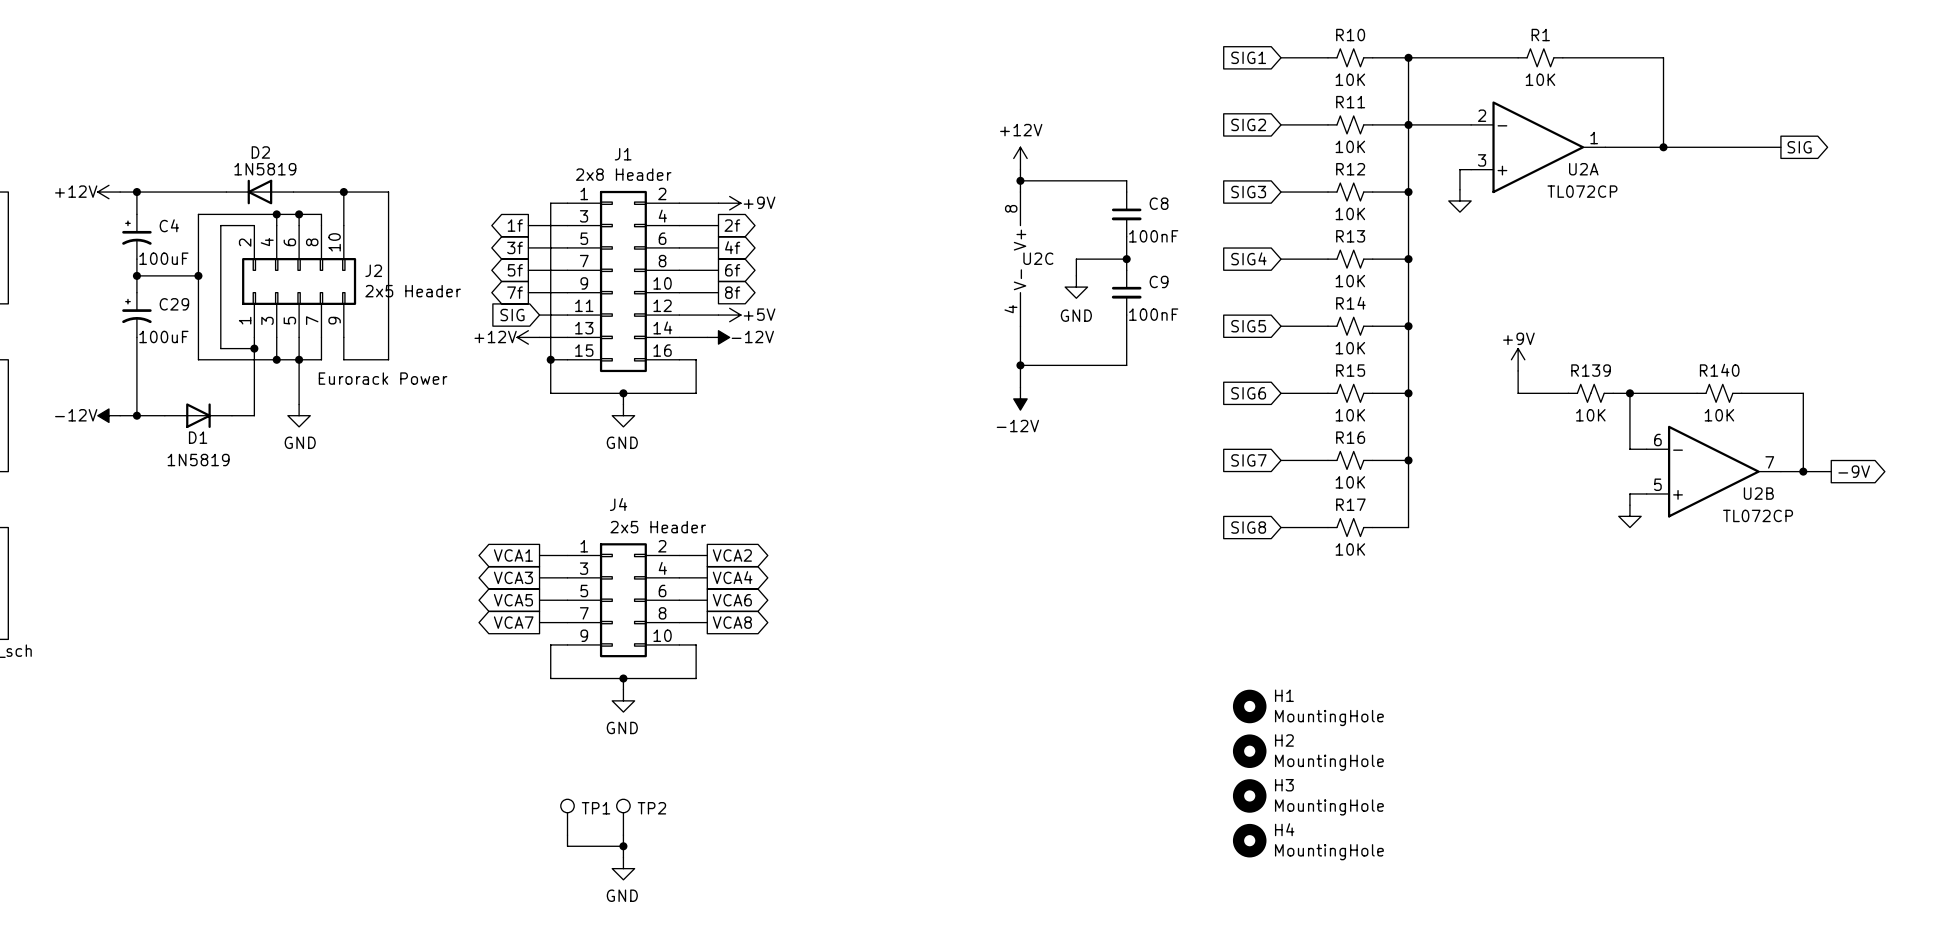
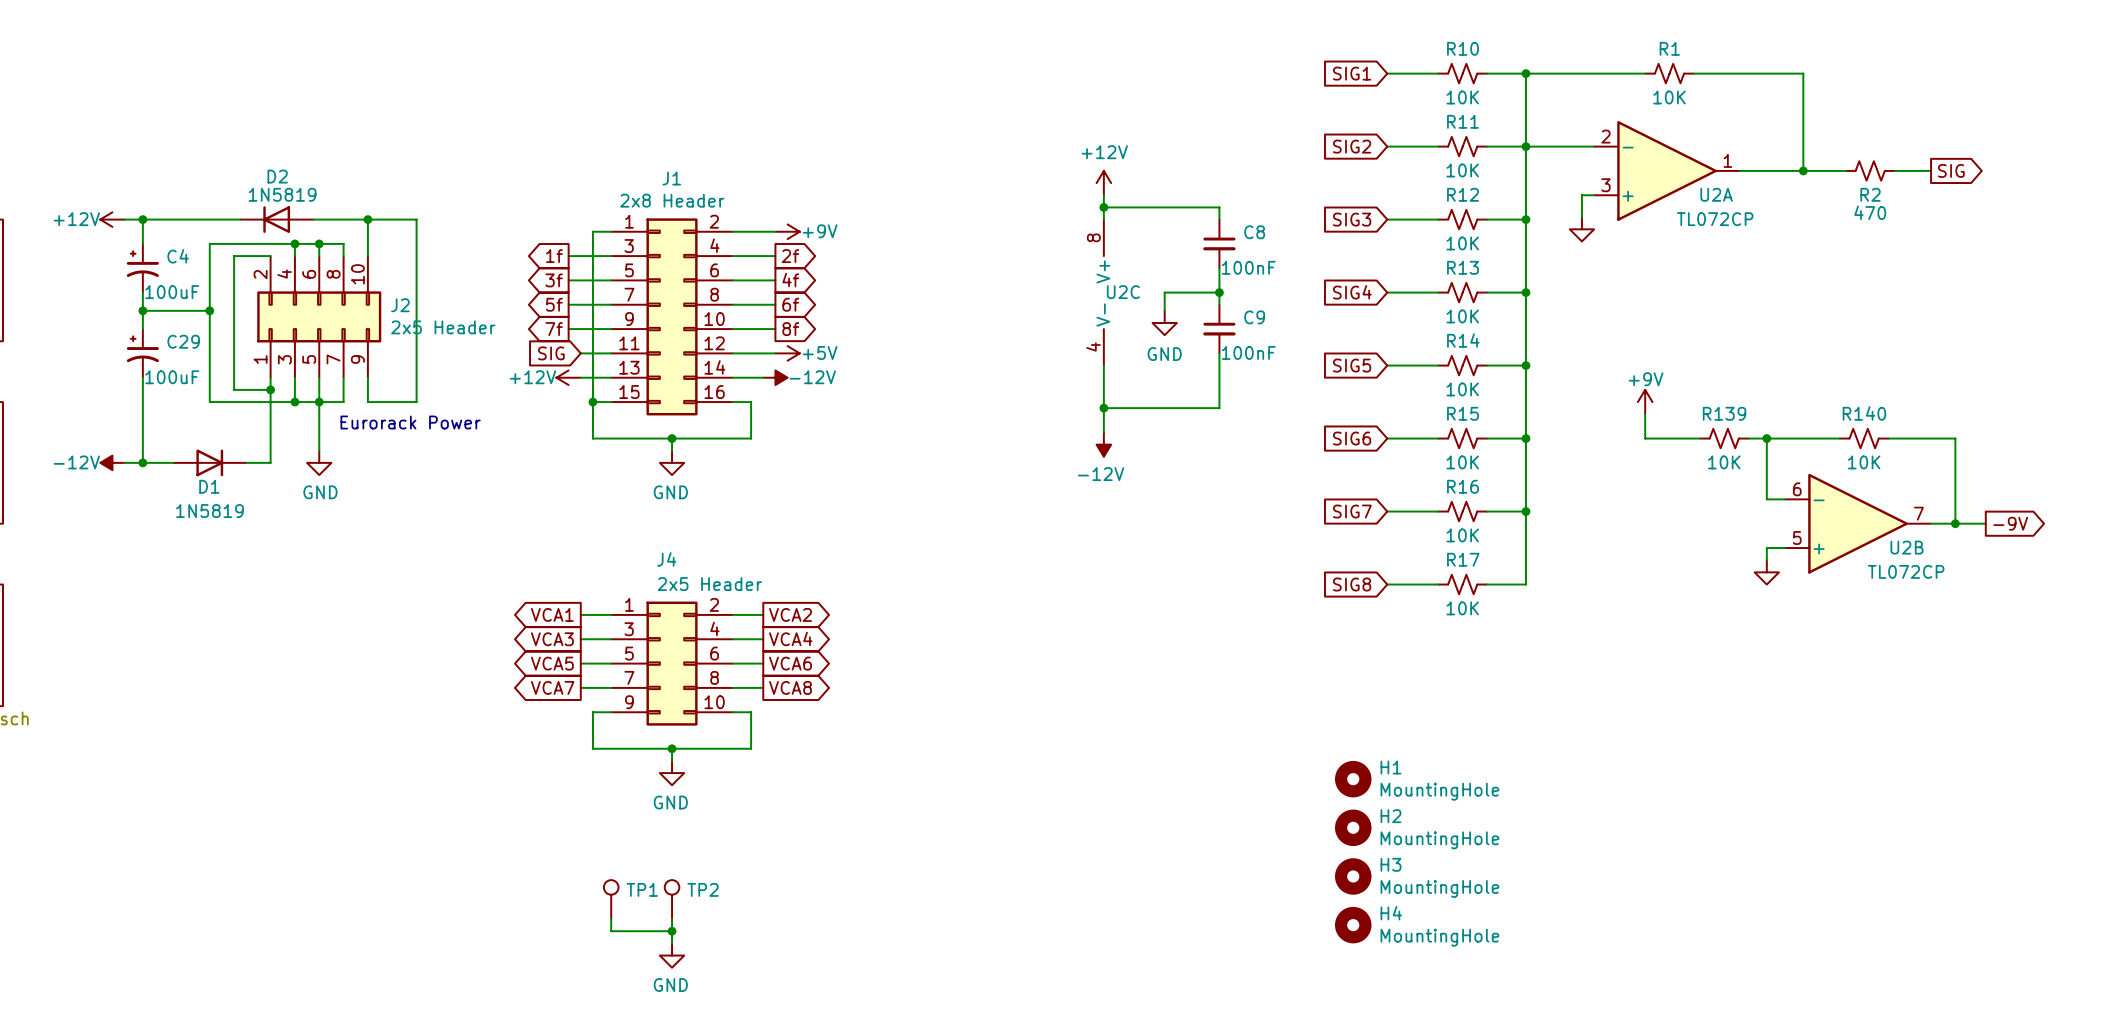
R2: none -> 470 (1870, 170)

